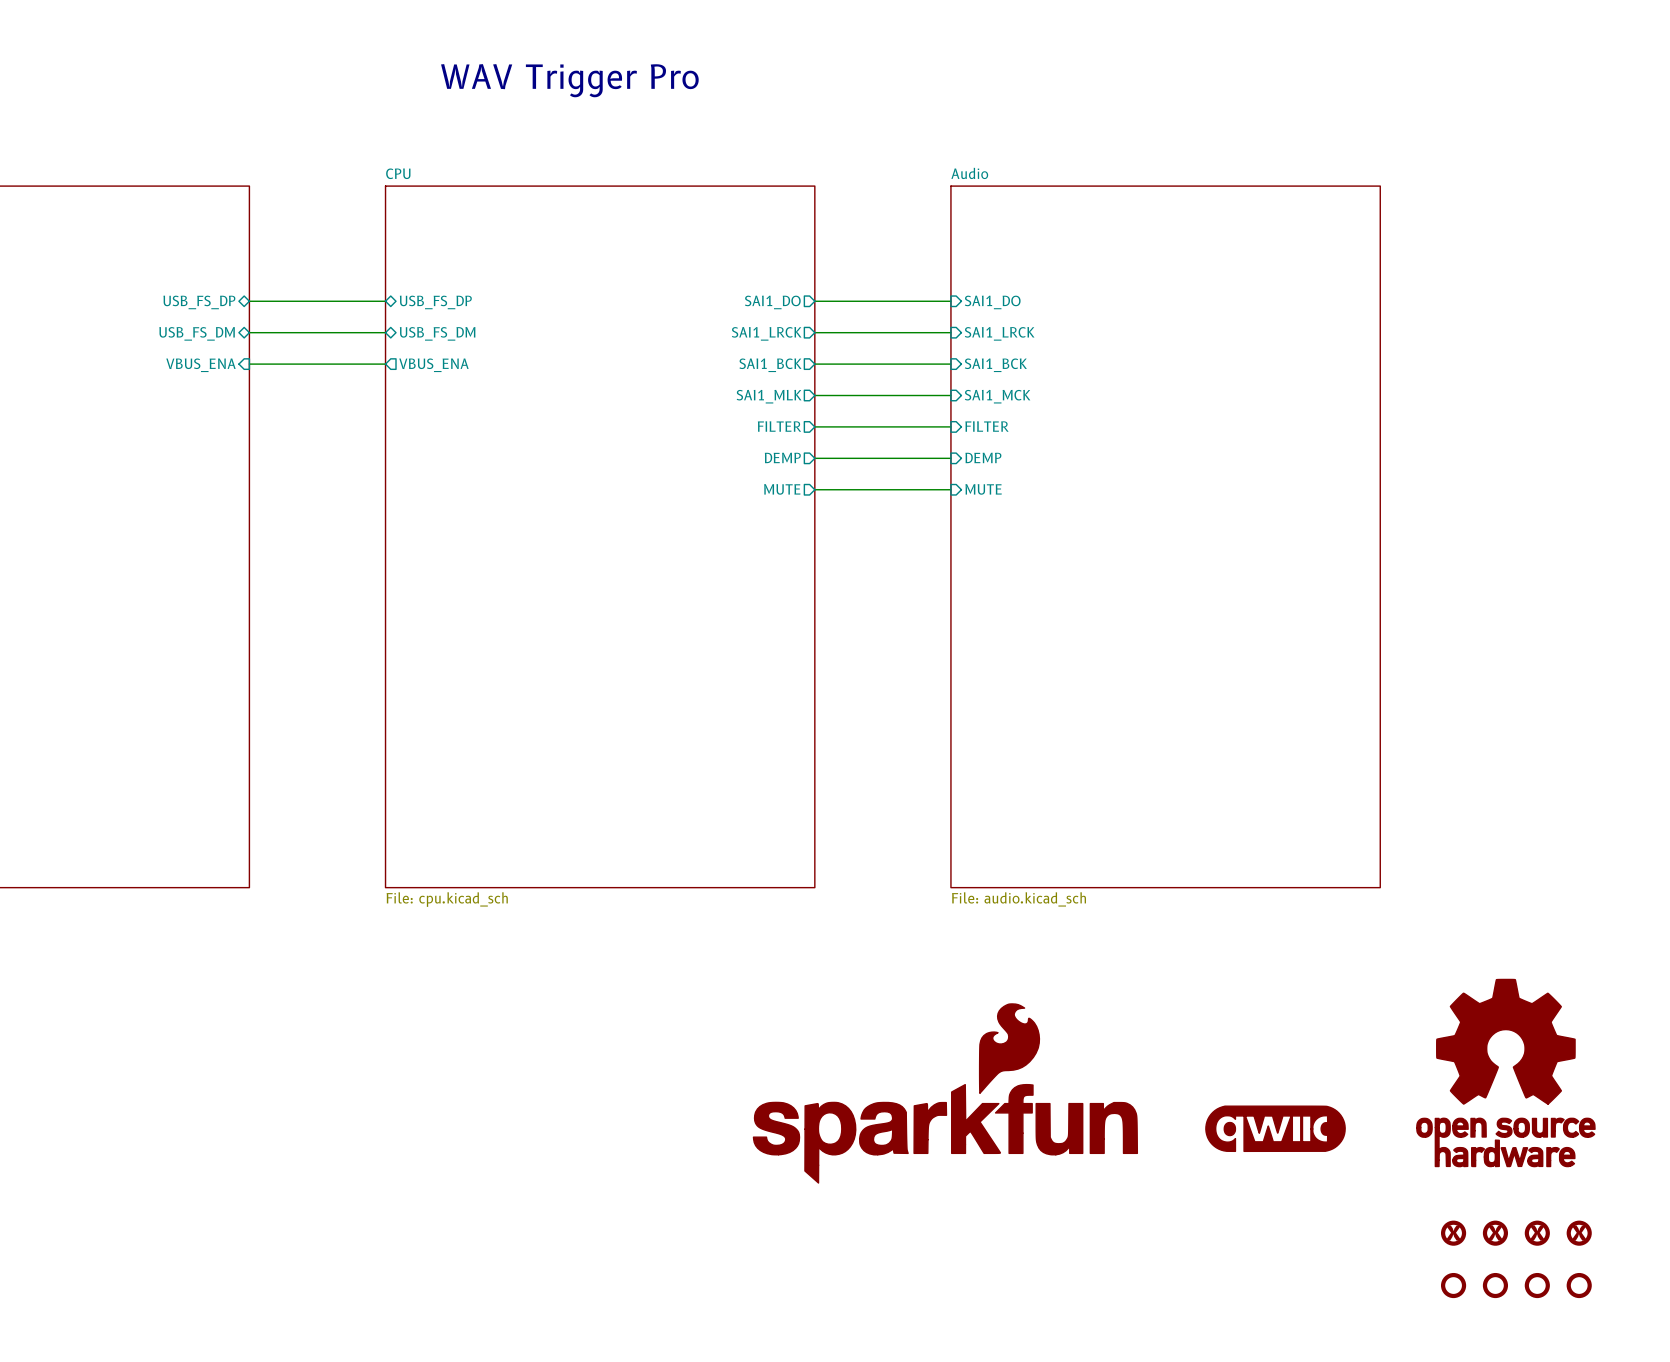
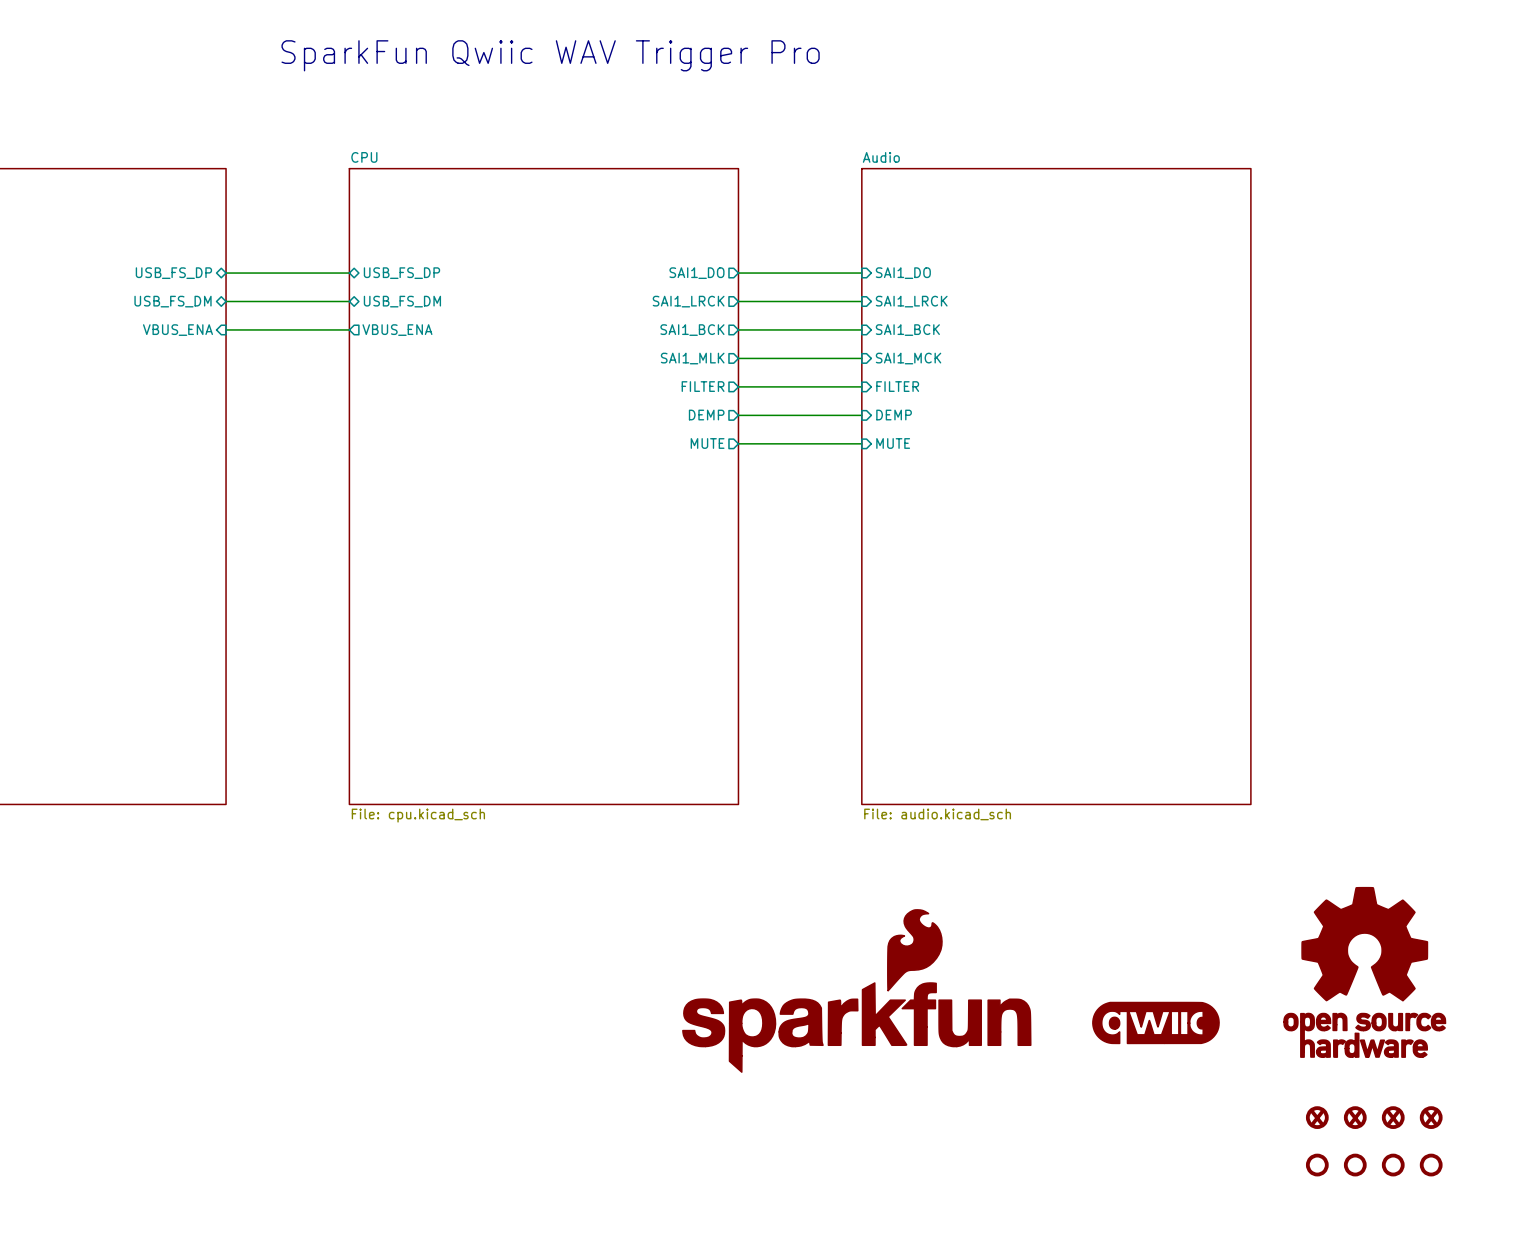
text: WAV Trigger Pro (569, 80) -> SparkFun Qwiic WAV Trigger Pro (550, 55)

